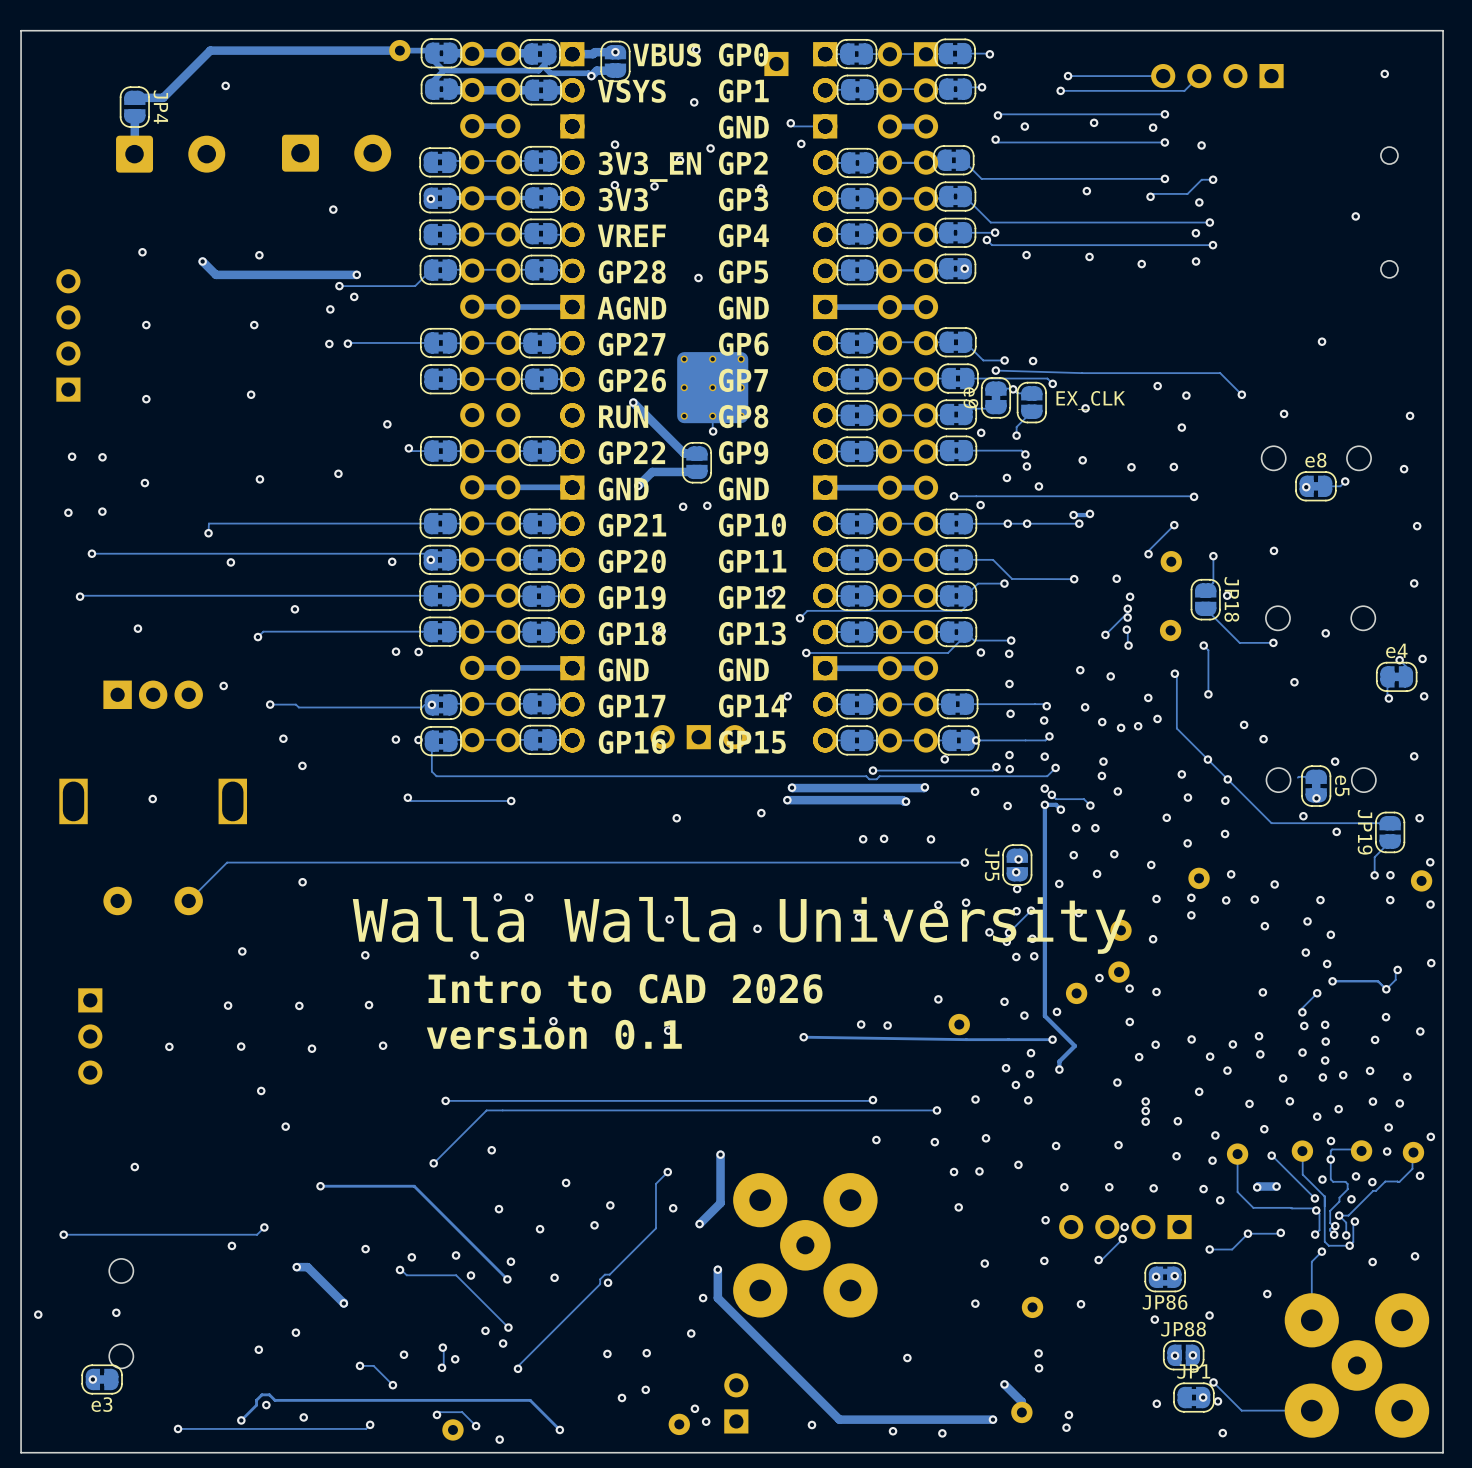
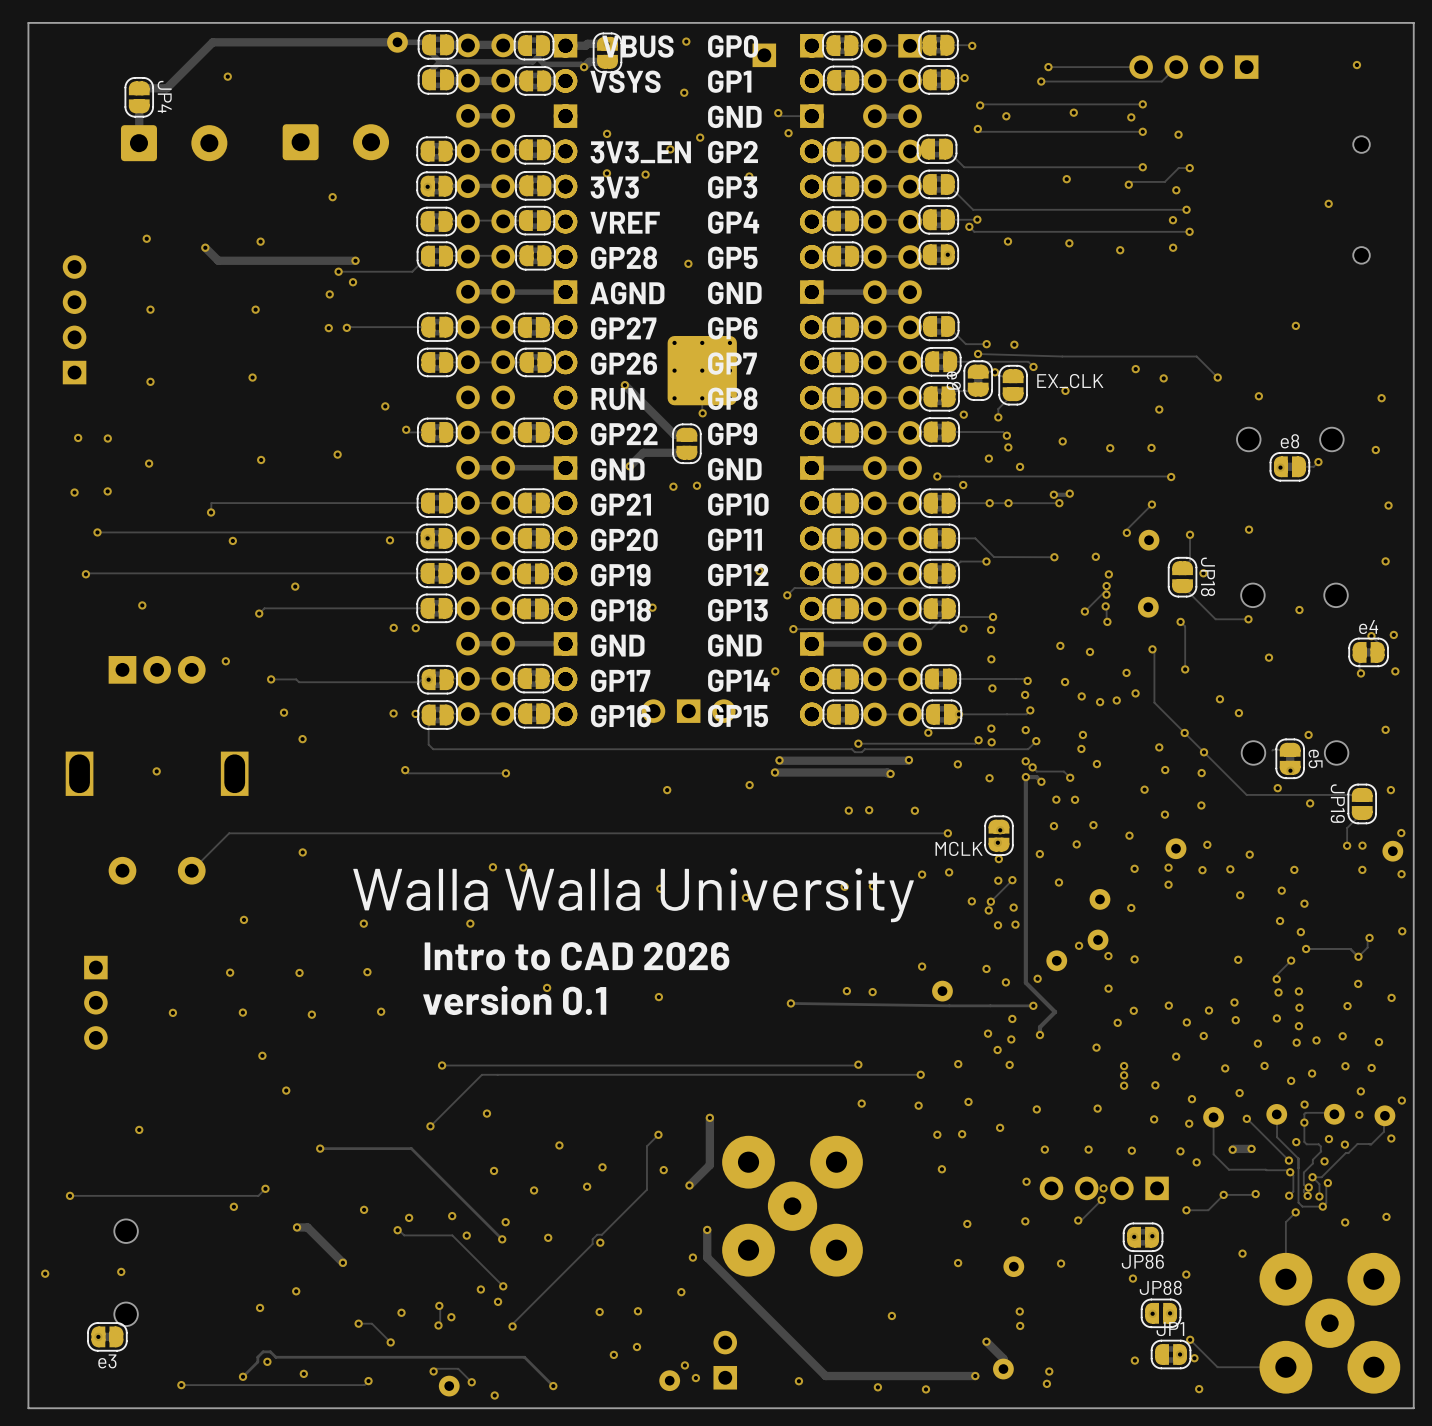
JP5 name: JP5 (992, 864) -> MCLK (959, 848)

